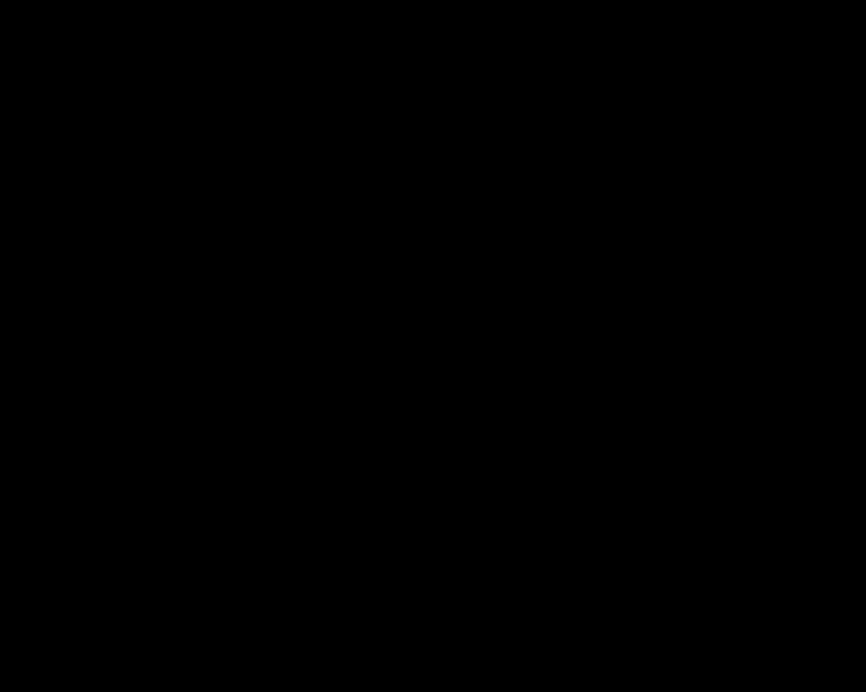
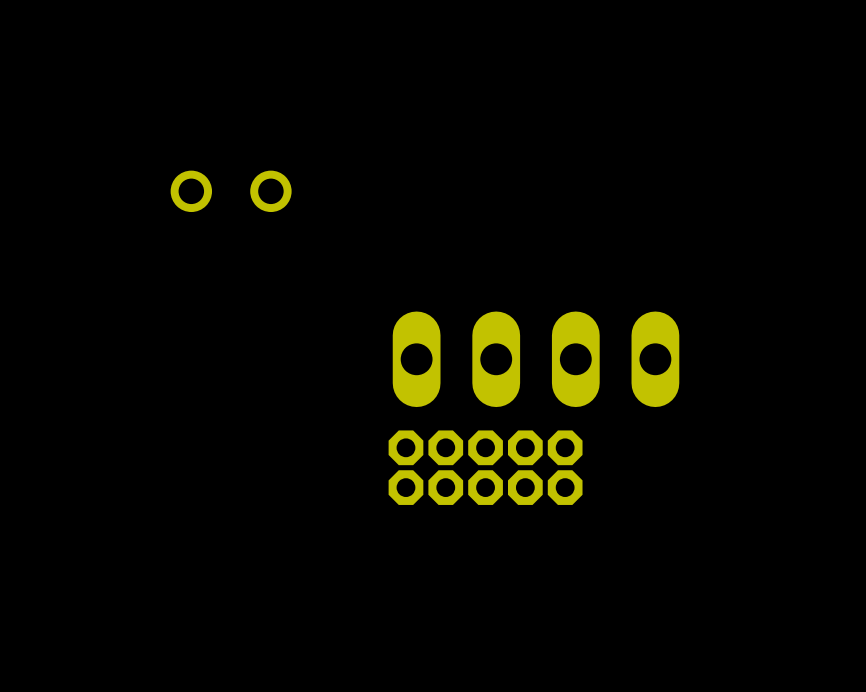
part: none -> (231, 191)
part: none -> (536, 359)
part: none -> (485, 467)

